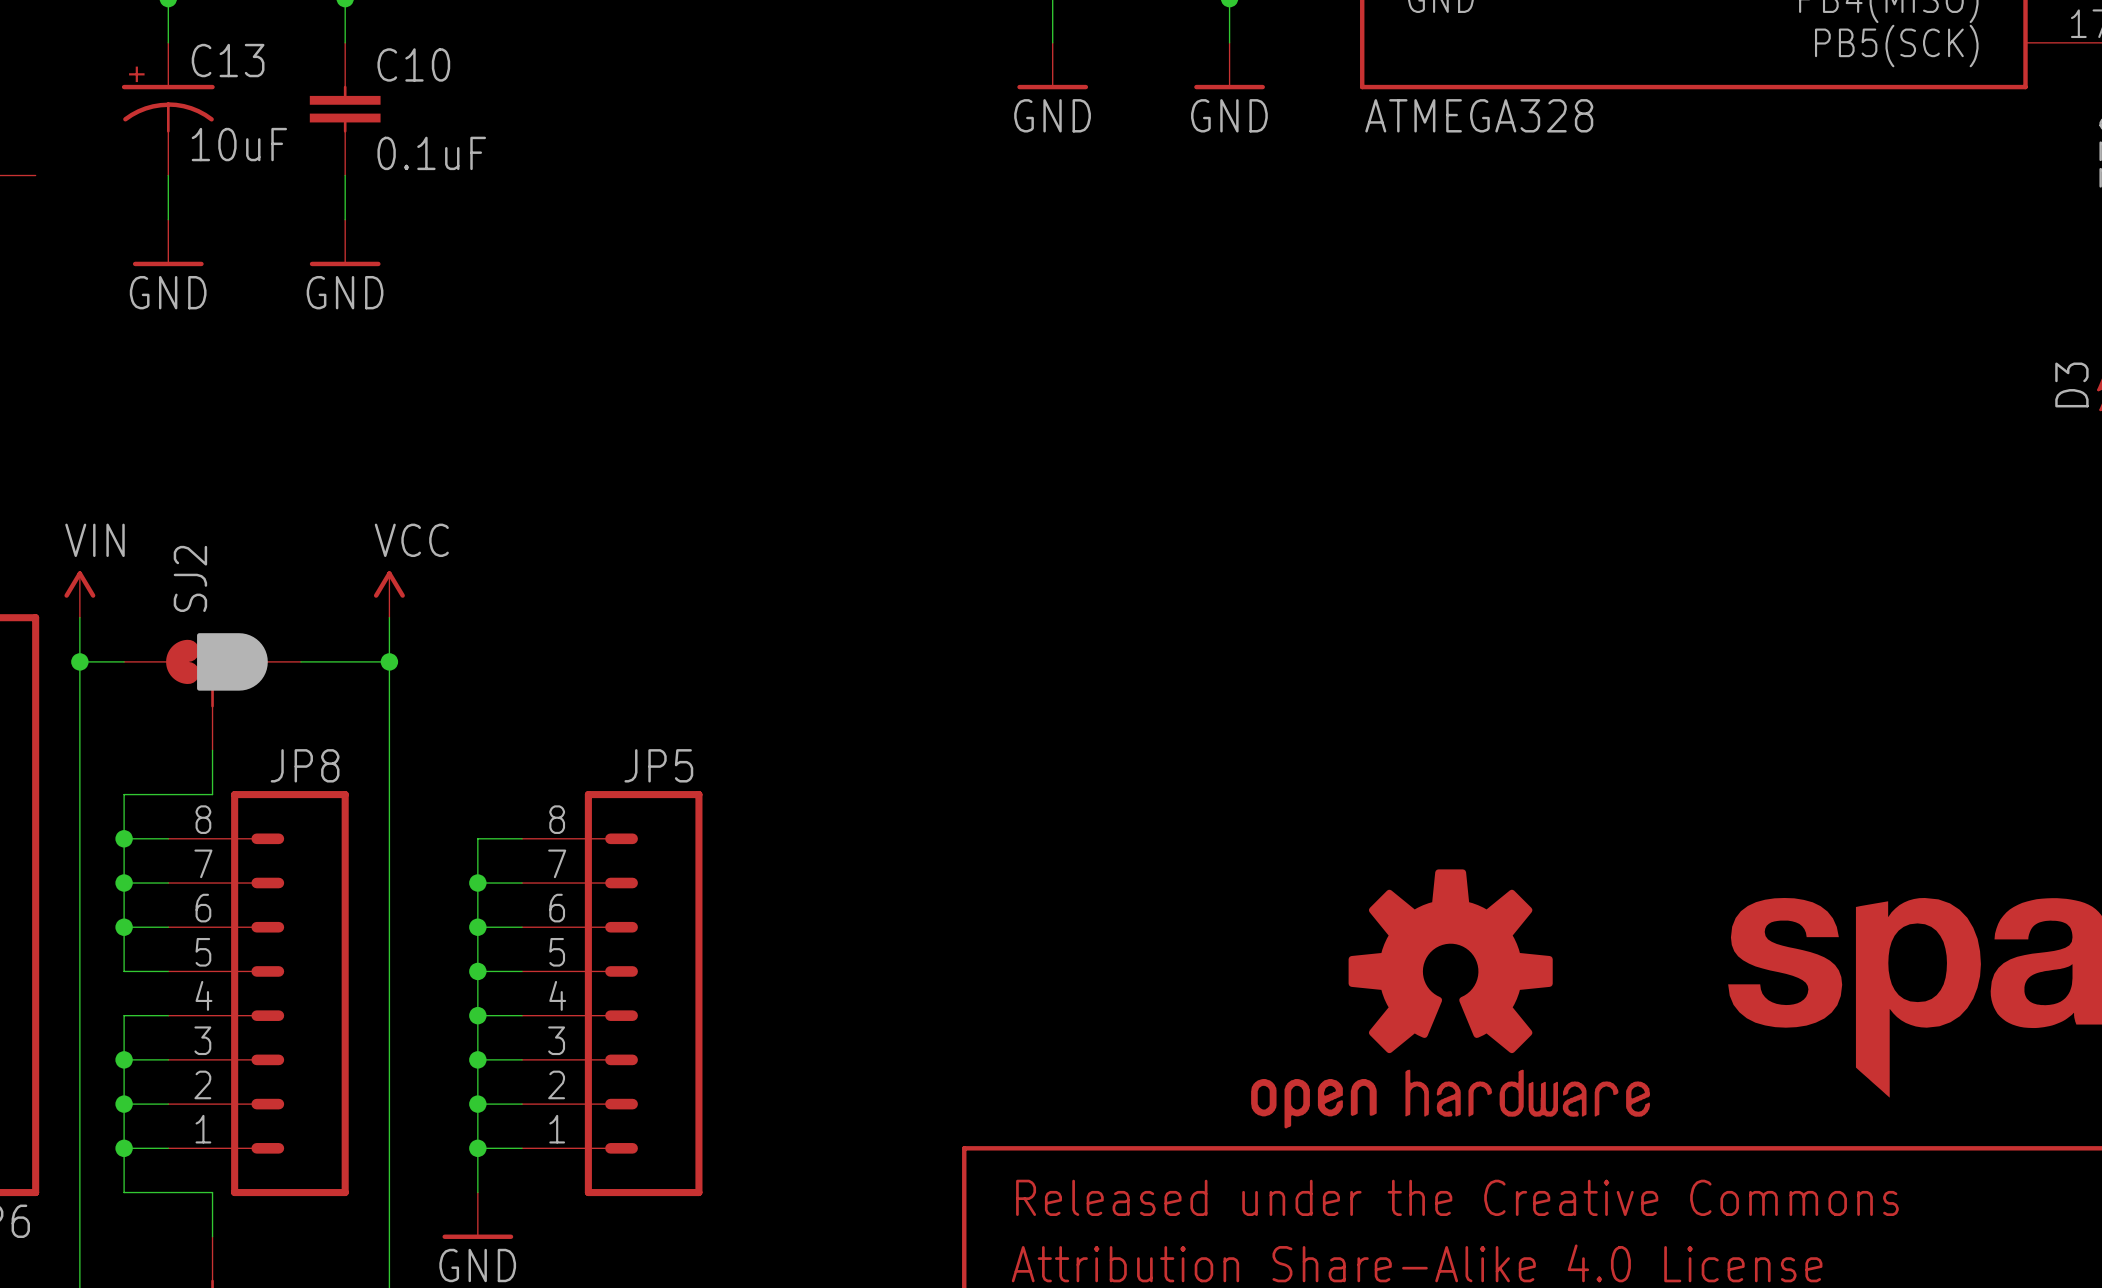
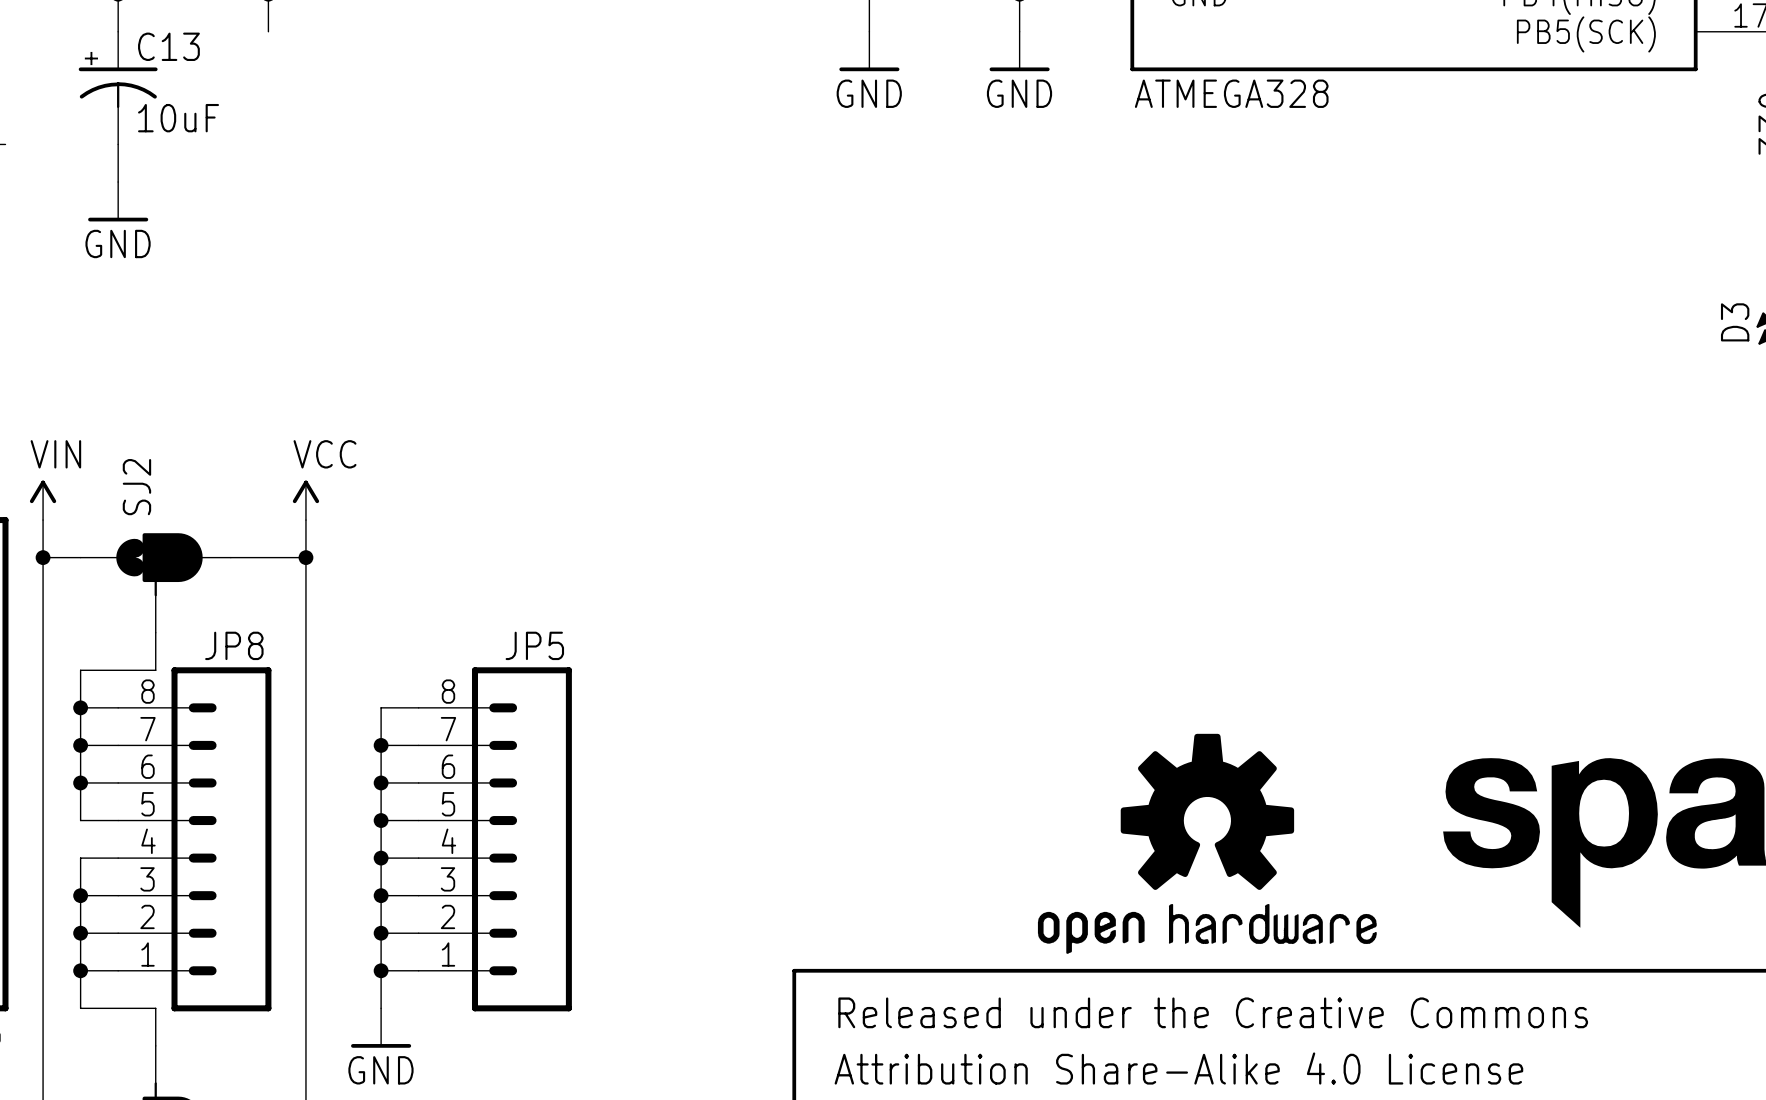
C10: 0.1uF (345, 109) -> none
wire: (345, 175) (345, 219) -> none
power symbol: GND (345, 242) -> none

